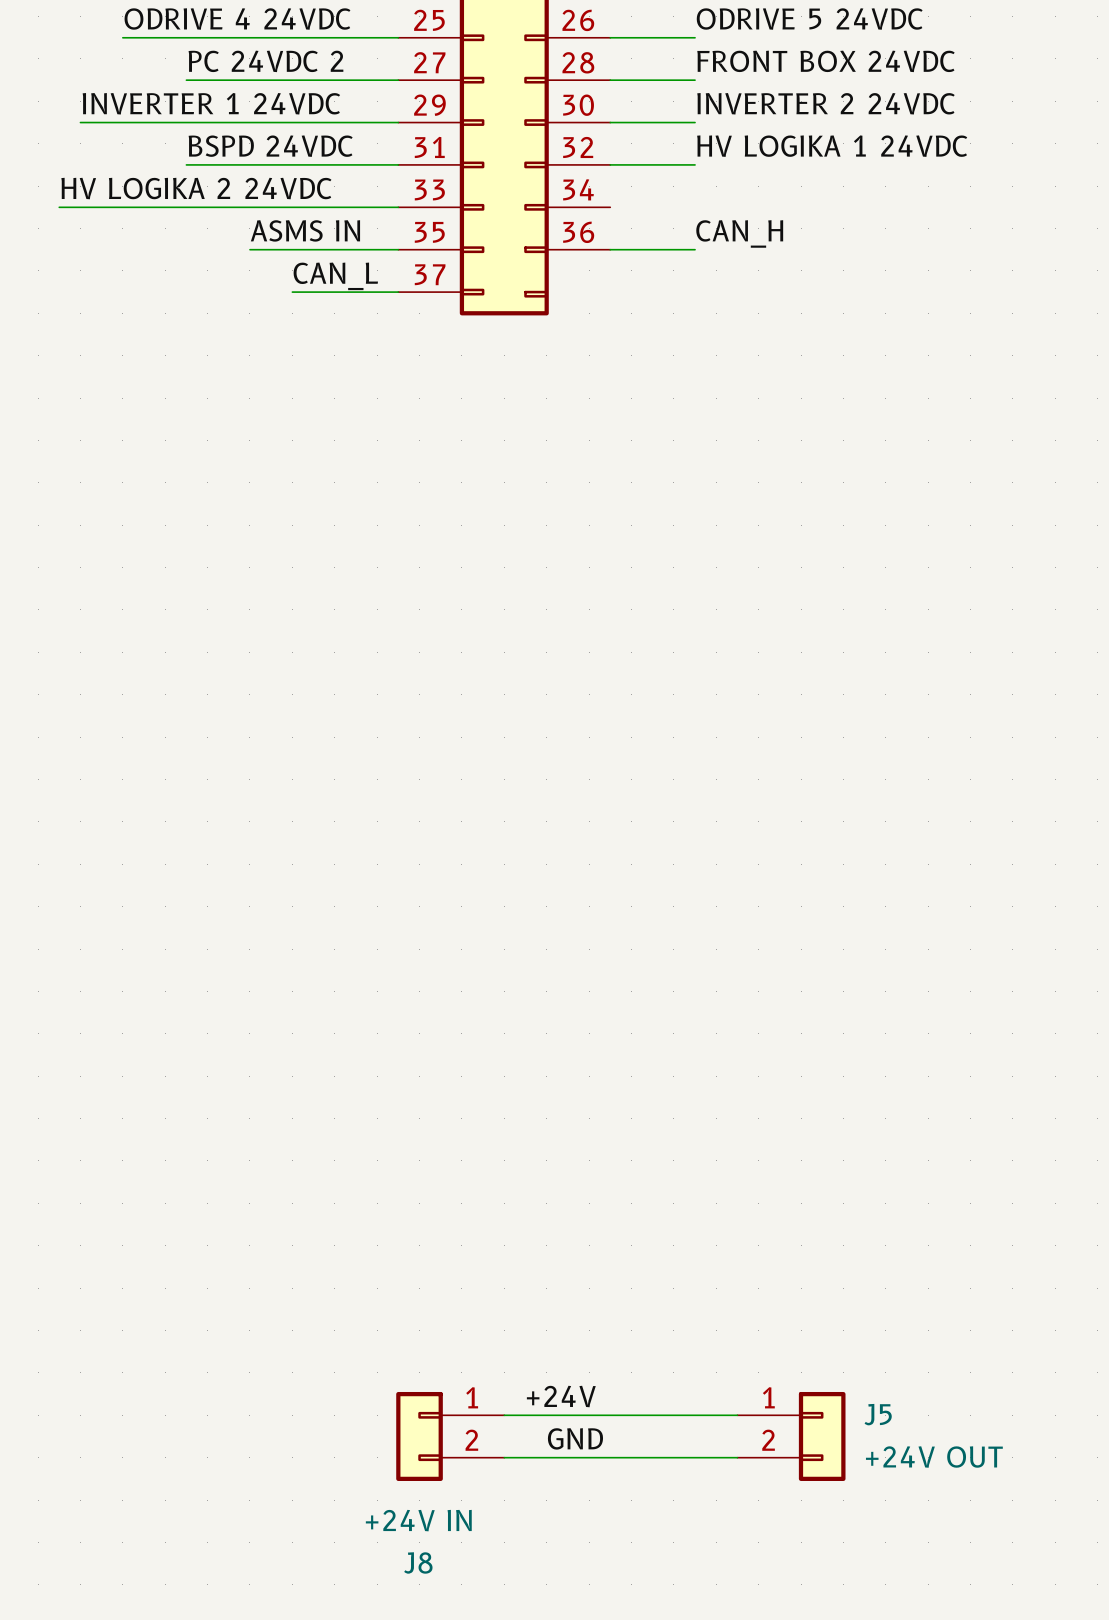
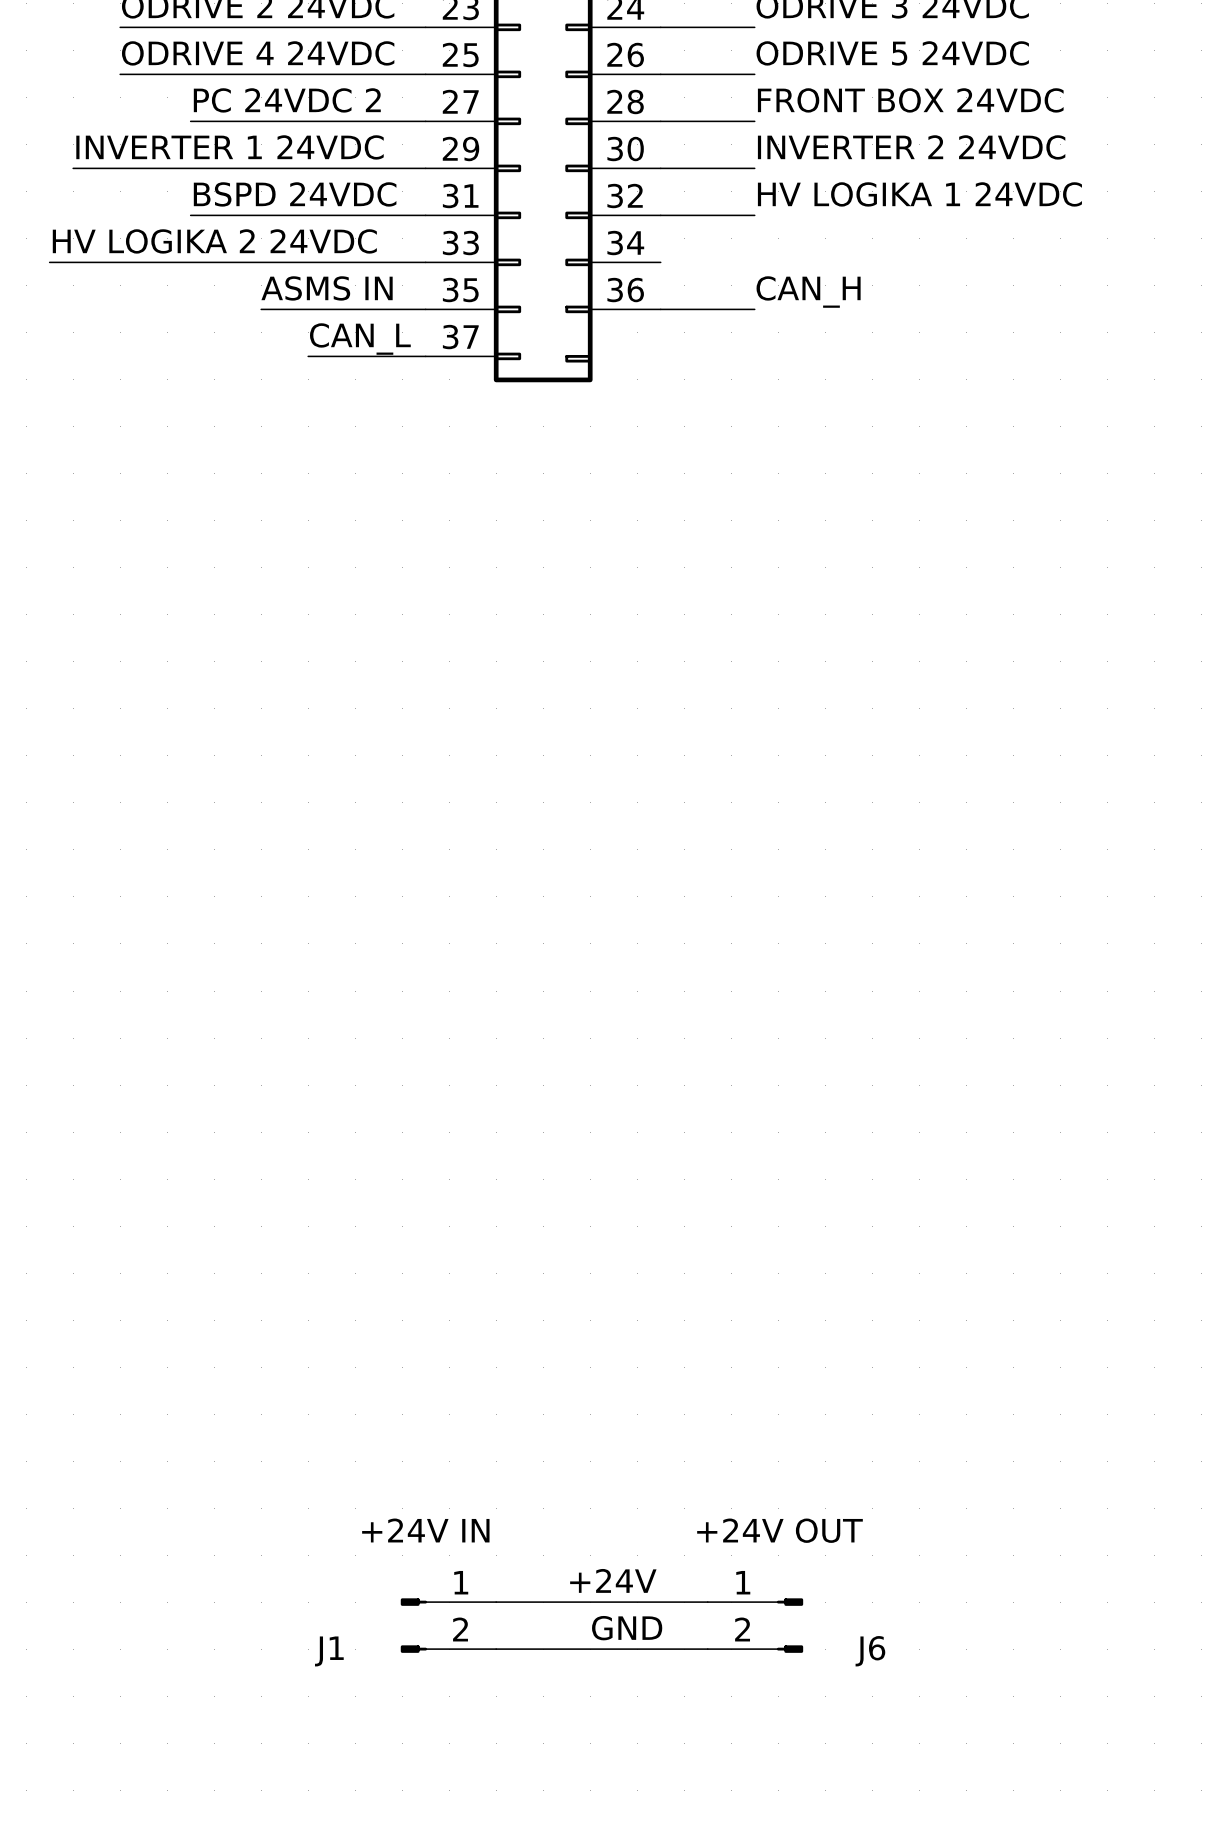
J1: none -> +24V IN (448, 1625)
J8: +24V IN (450, 1436) -> none
J6: none -> +24V OUT (755, 1625)
J5: +24V OUT (791, 1436) -> none

